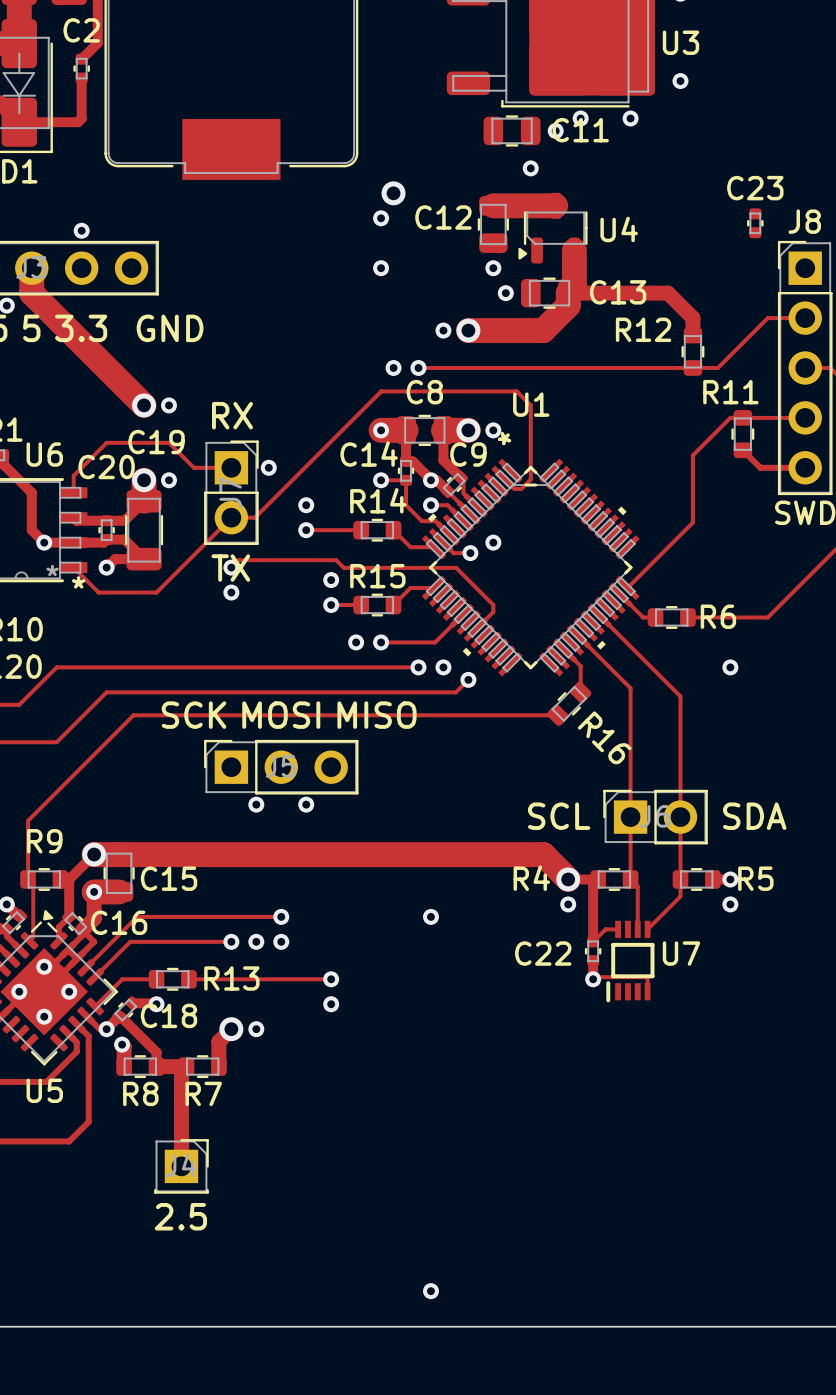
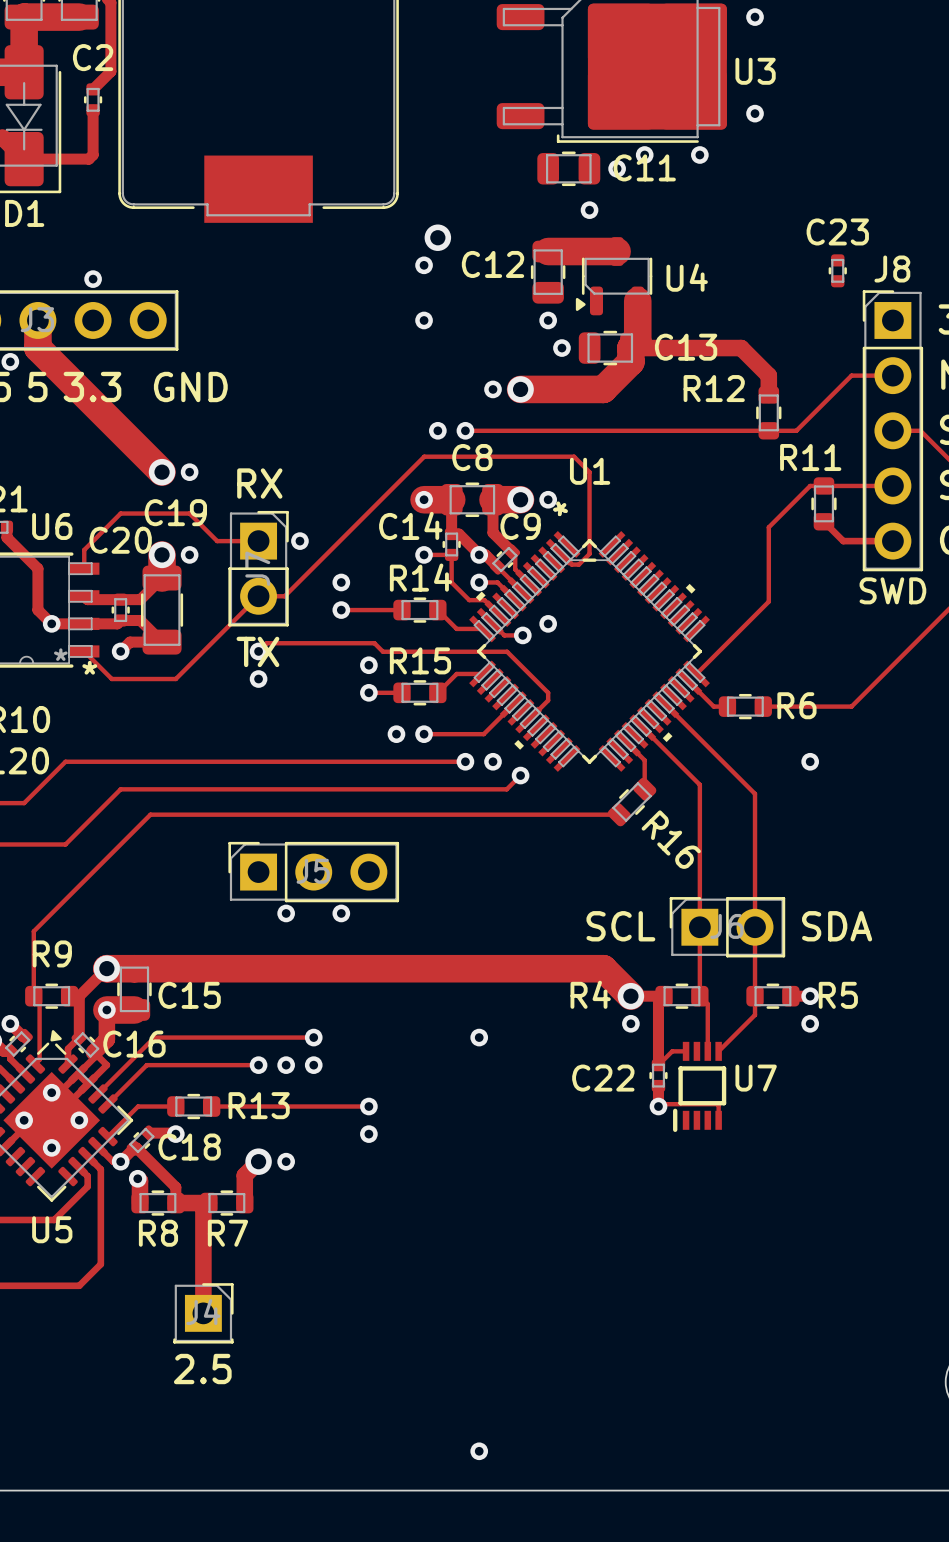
text: SCK (193, 715) -> none
text: MOSI (281, 715) -> none
text: MISO (376, 715) -> none

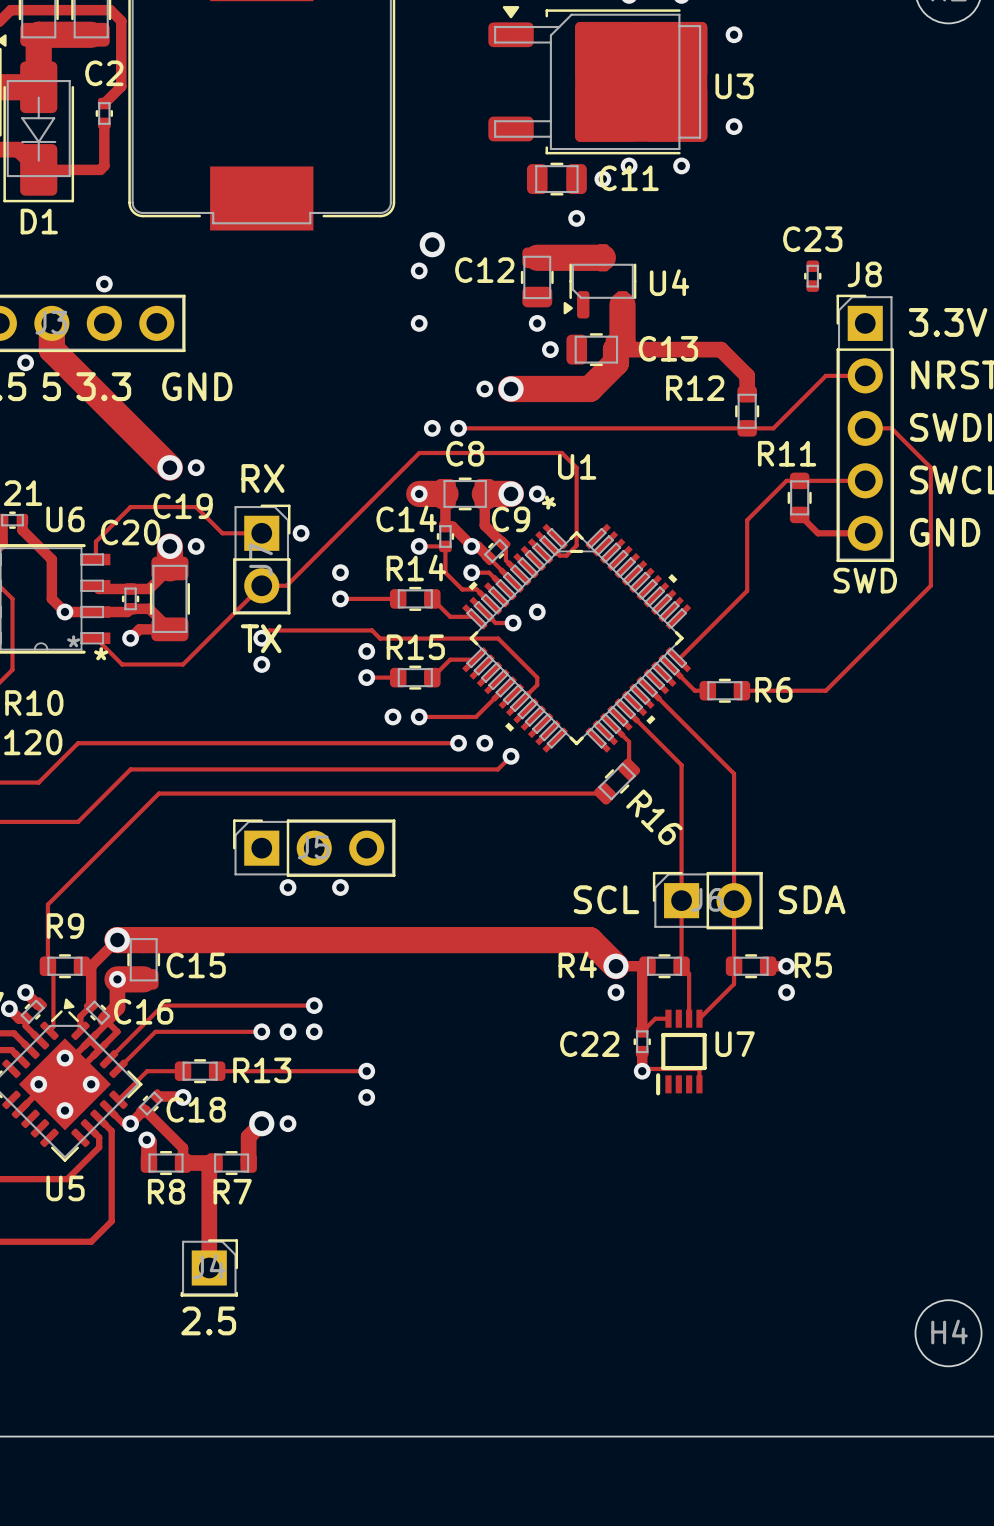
via: (810, 761) -> none
via: (479, 1037) -> none
via: (479, 1451) -> none

